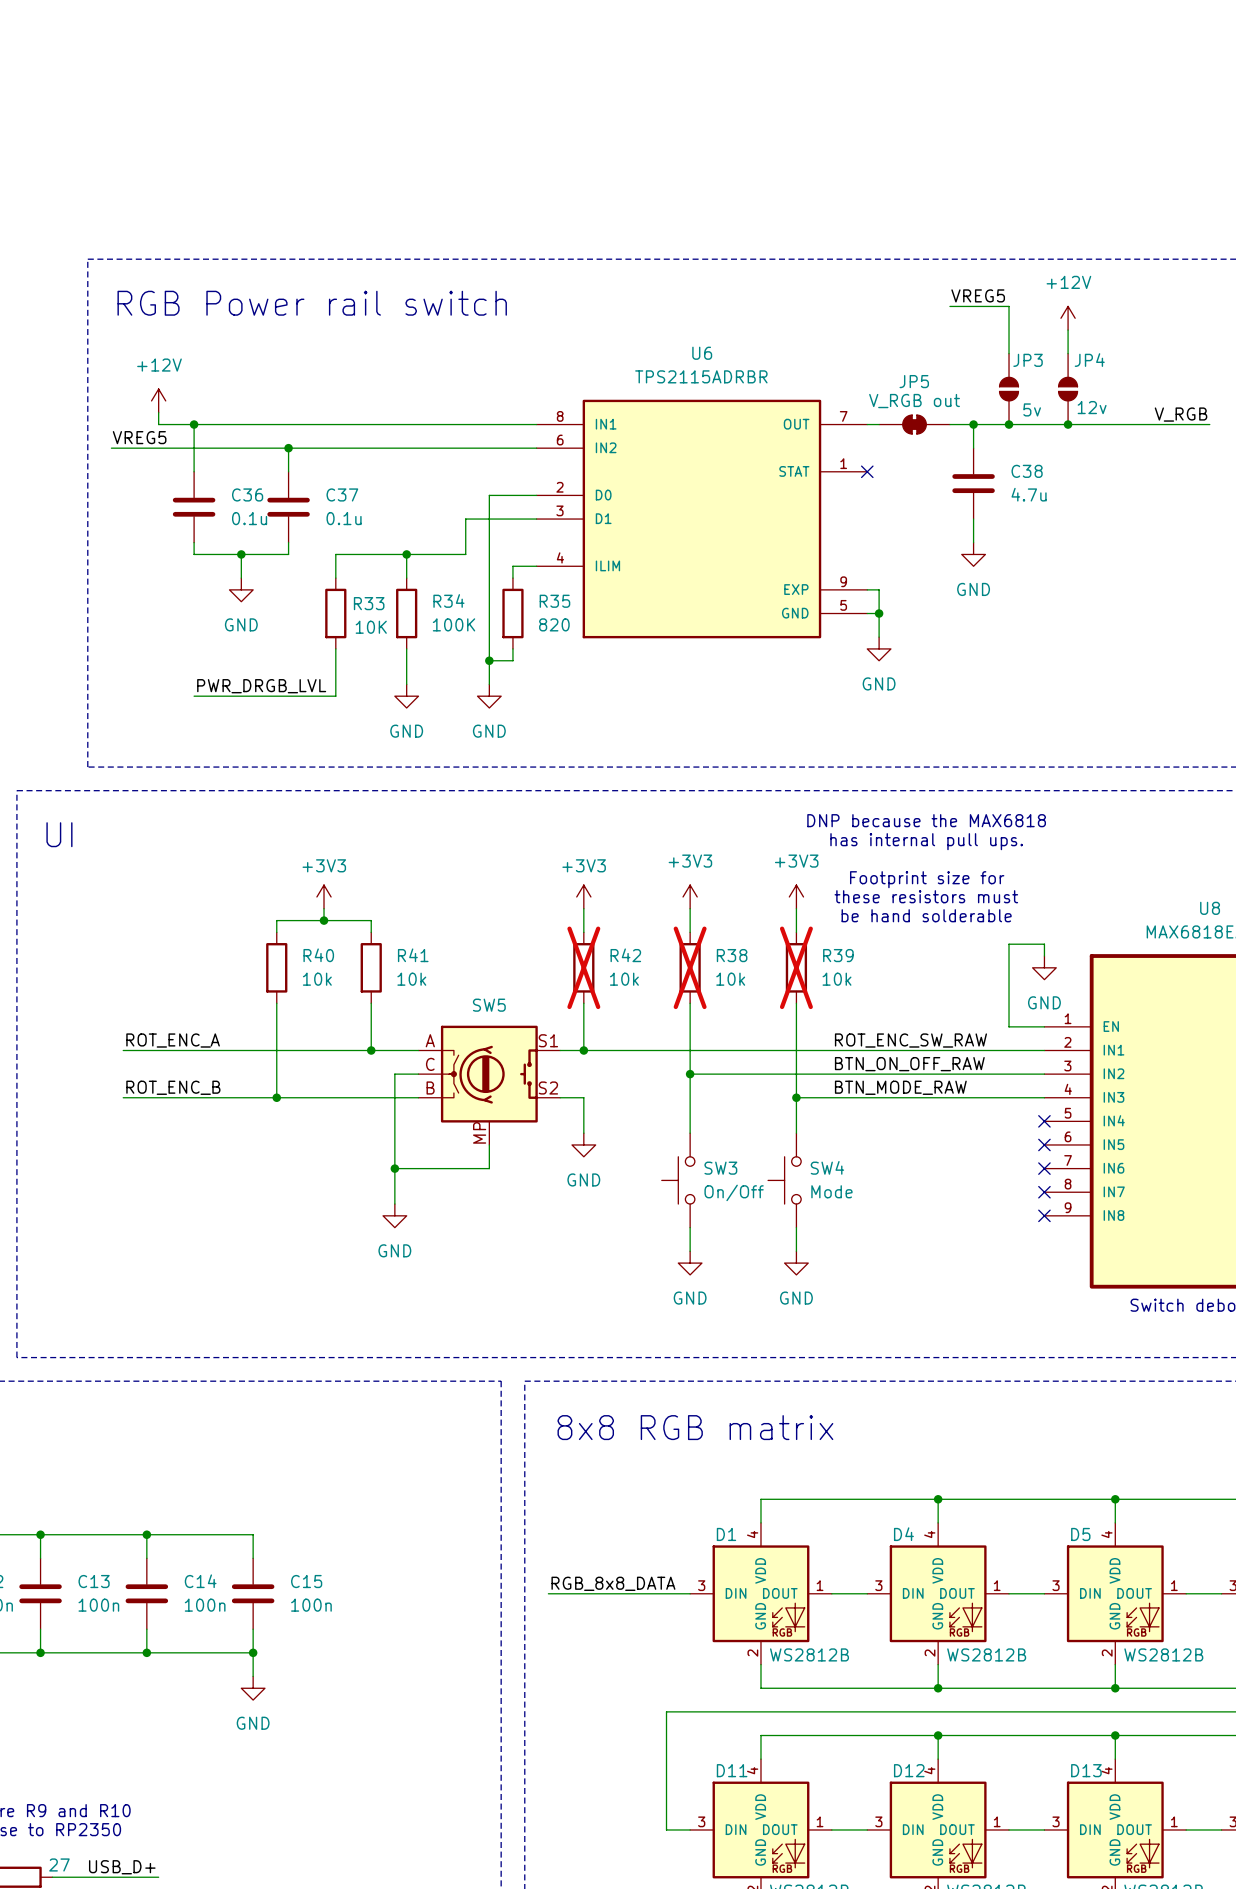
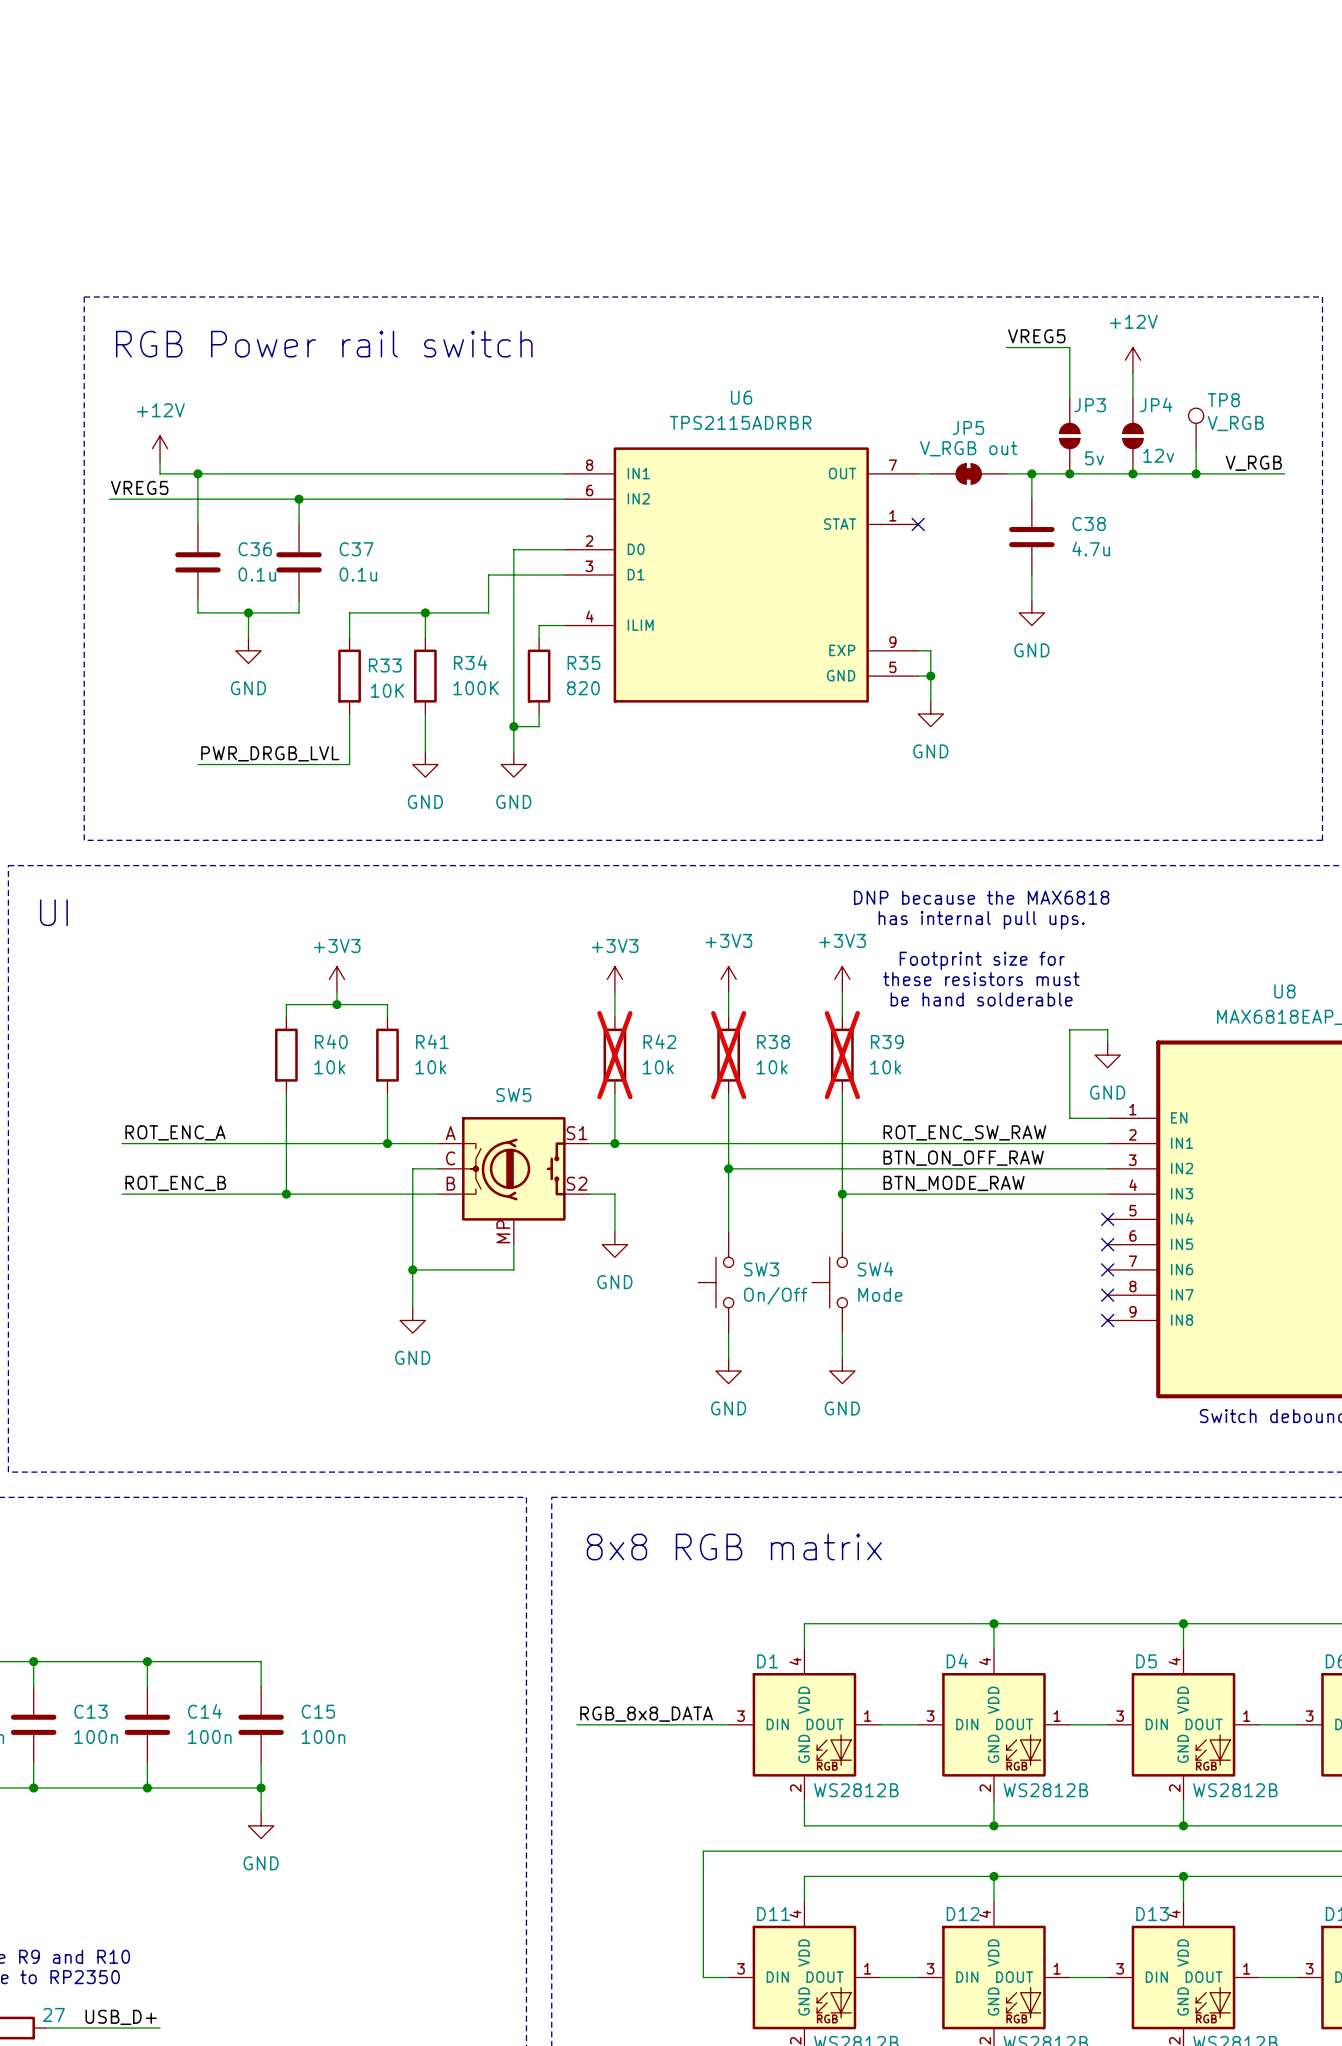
TP8: none -> V_RGB (1196, 428)
wire: none -> (1196, 448) (1196, 473)
junction: none -> (1196, 473)

